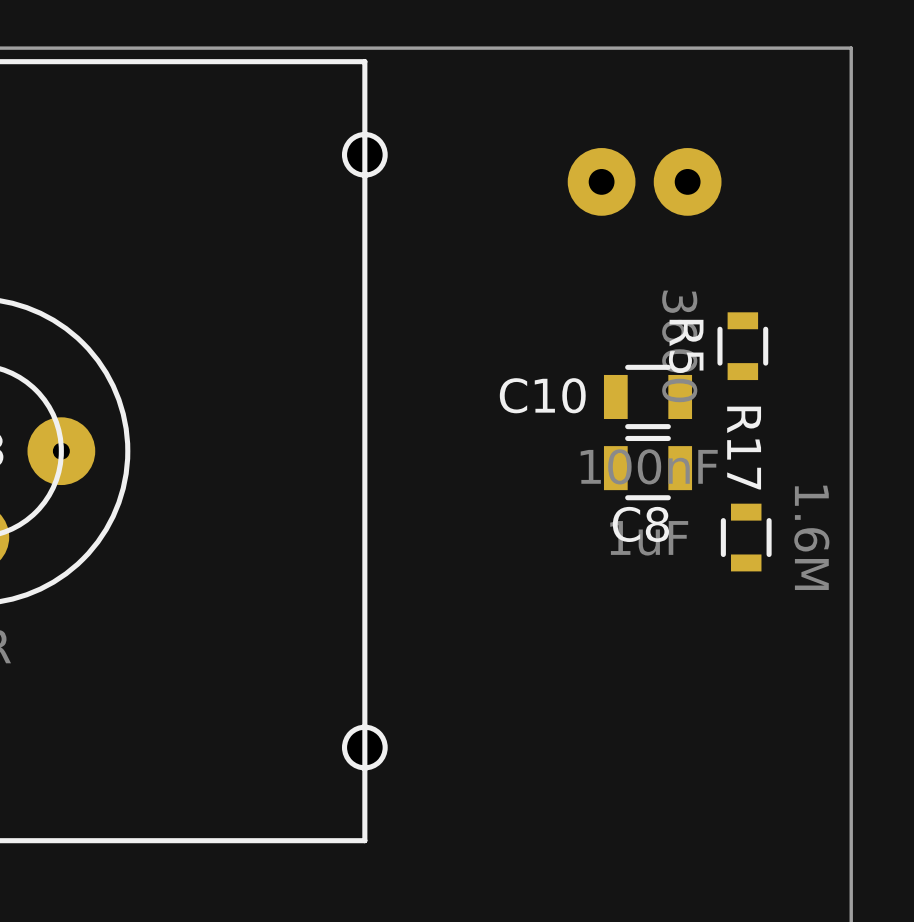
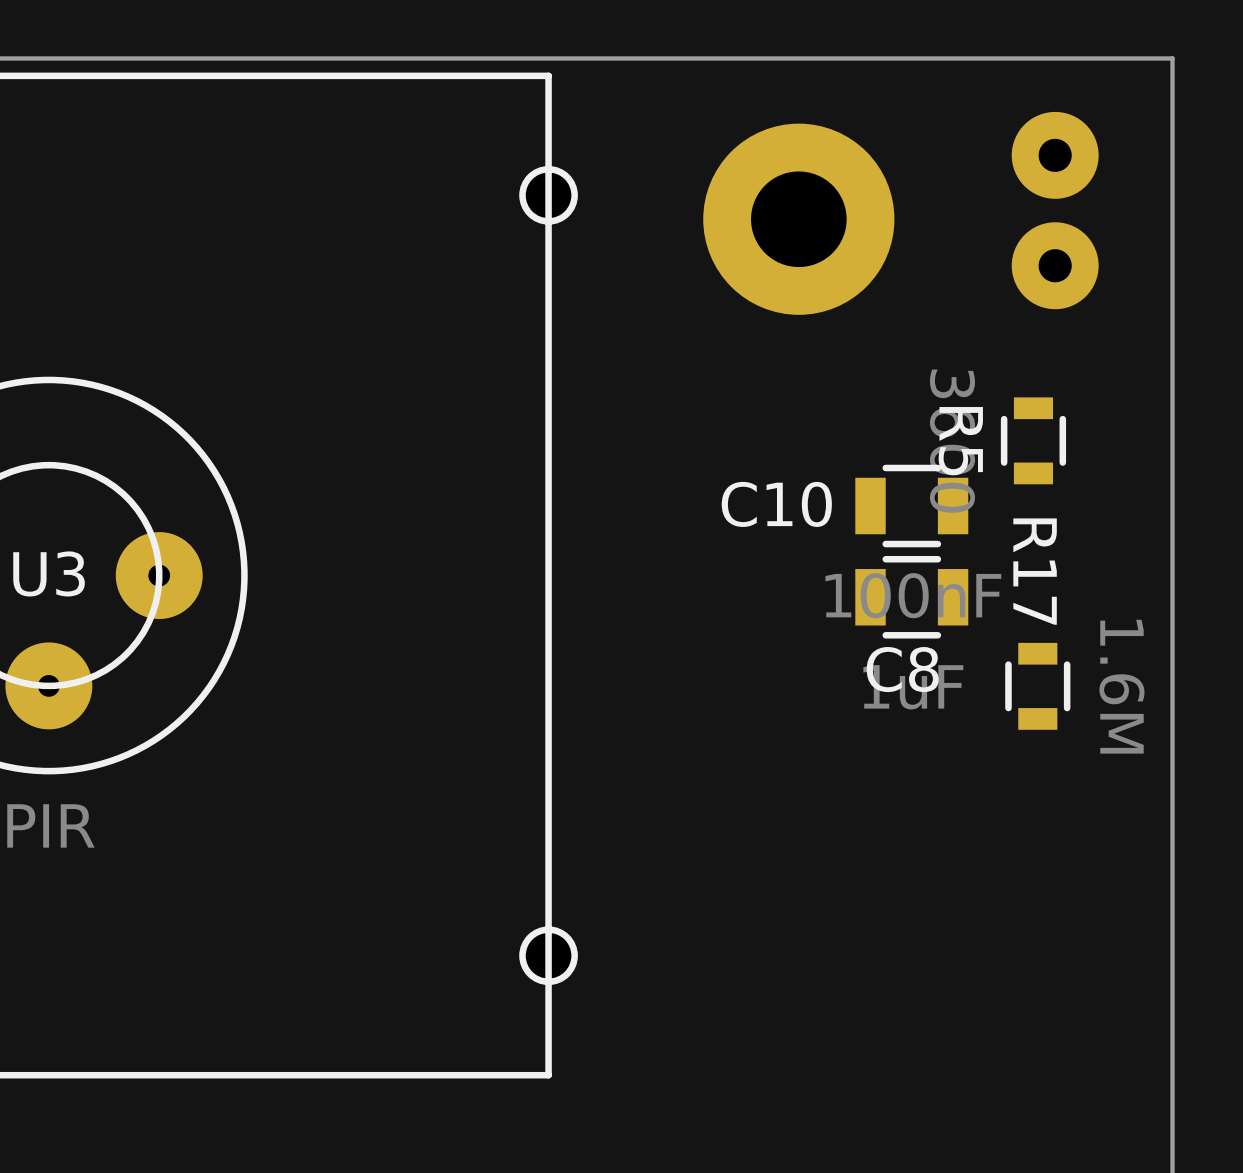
part: none -> (798, 219)
part rotation: 0° (644, 181) -> 90° clockwise (1055, 210)
part position: (644, 181) -> (1055, 210)

